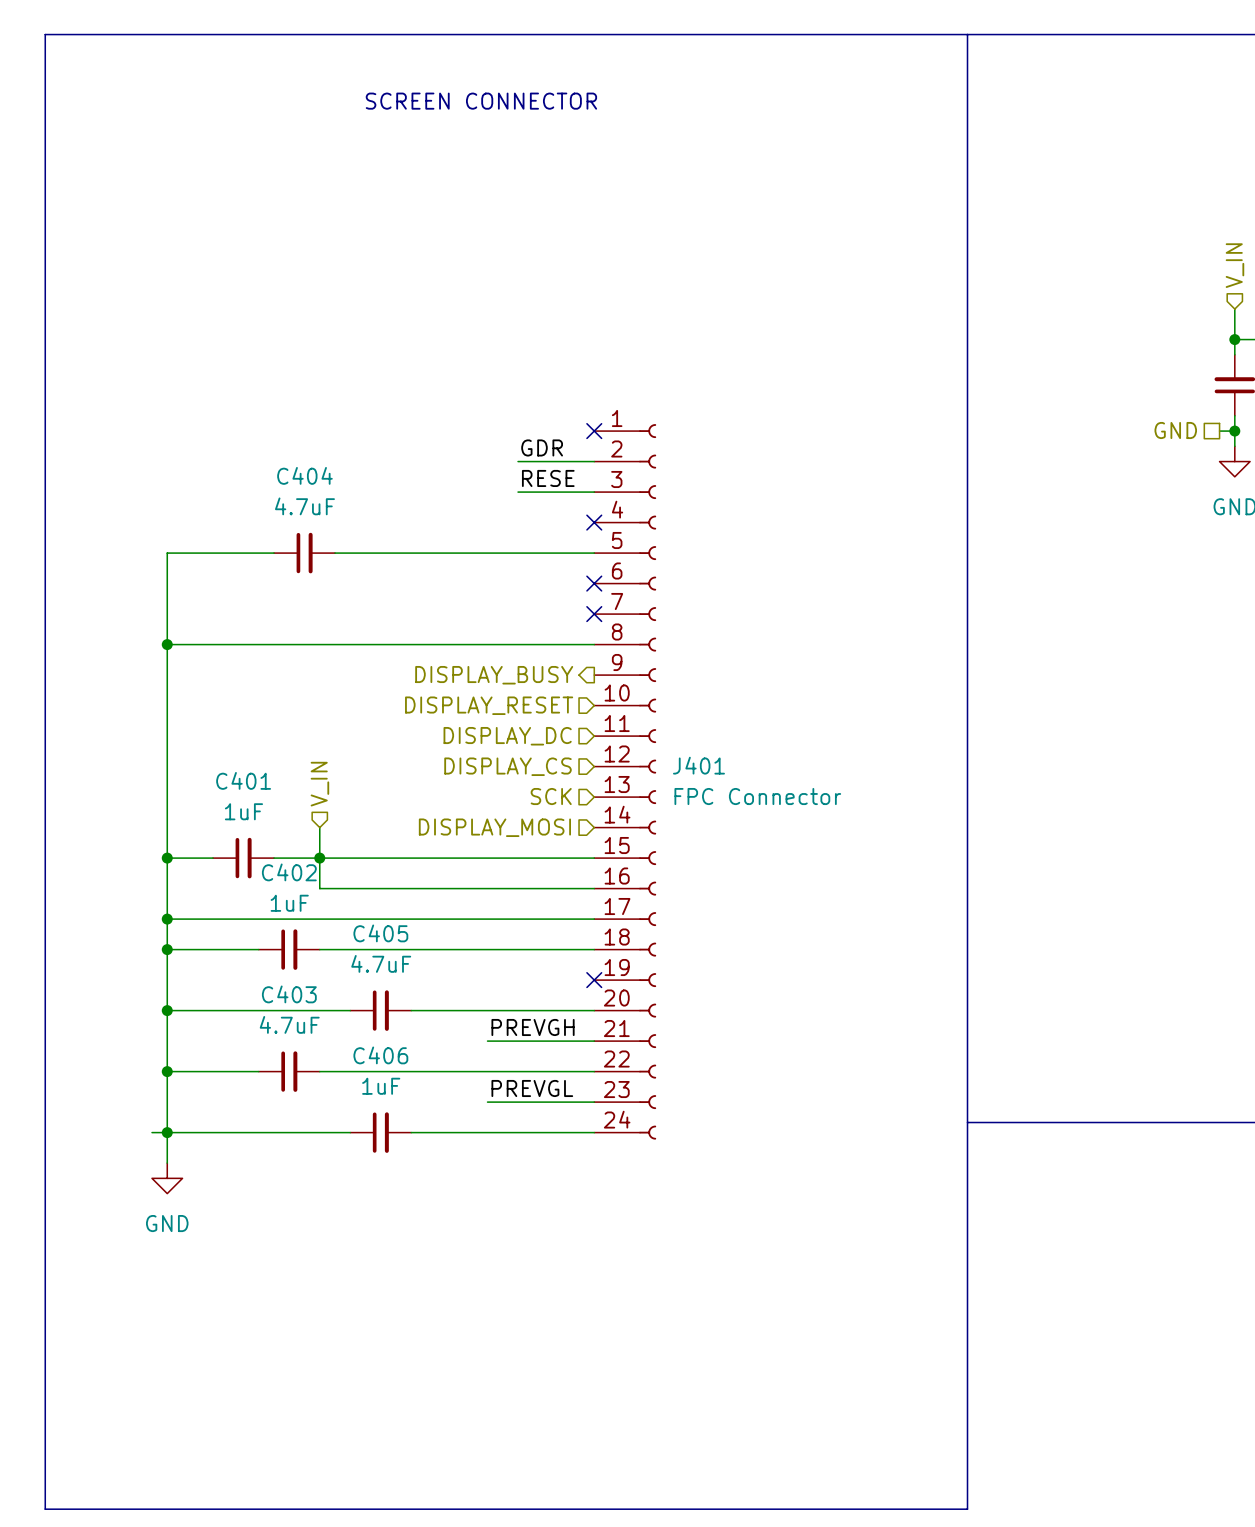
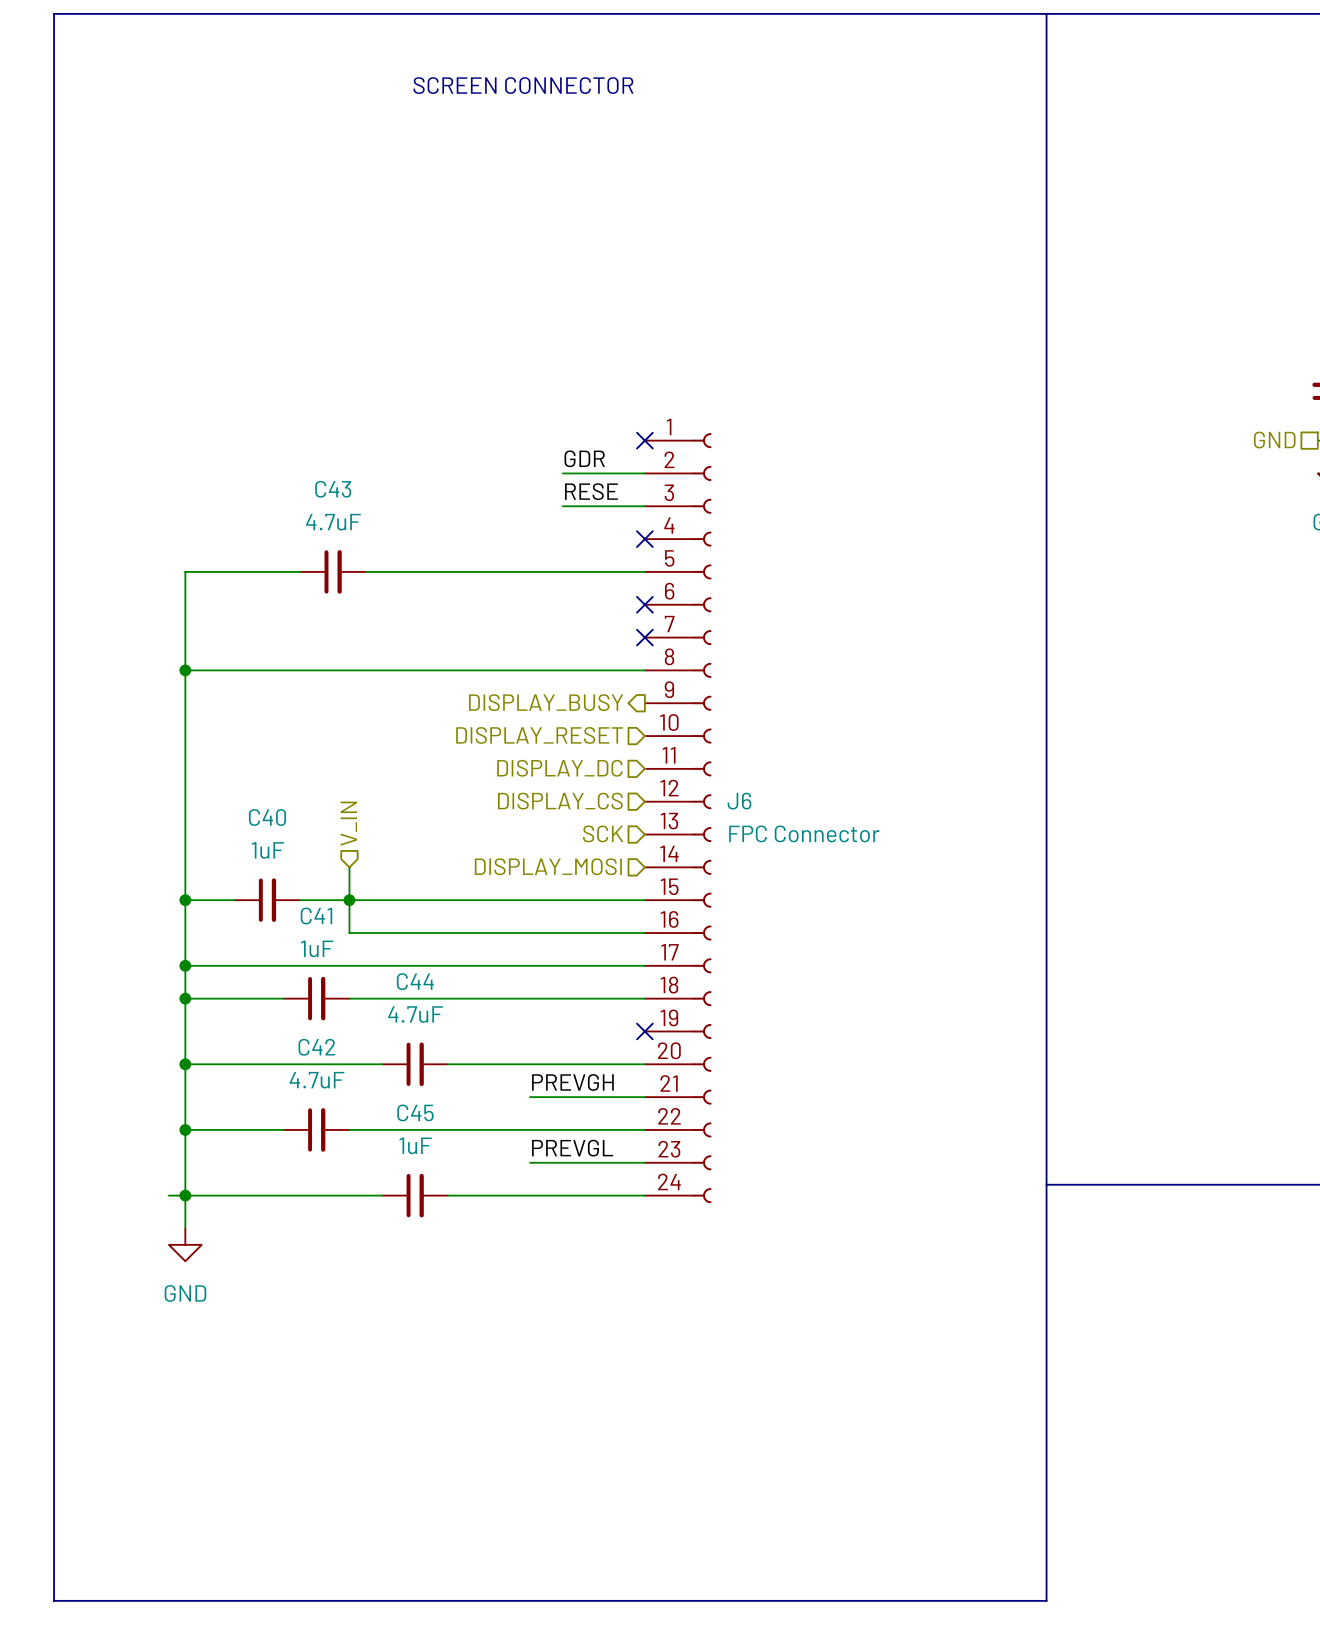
C404 name: C404 (304, 475) -> C43 (333, 489)
J401 name: J401 (698, 765) -> J6 (739, 801)
C401 name: C401 (243, 780) -> C40 (267, 817)
C402 name: C402 (289, 872) -> C41 (316, 915)
C405 name: C405 (380, 933) -> C44 (415, 981)
C403 name: C403 (289, 994) -> C42 (316, 1047)
C406 name: C406 (380, 1055) -> C45 (415, 1112)

